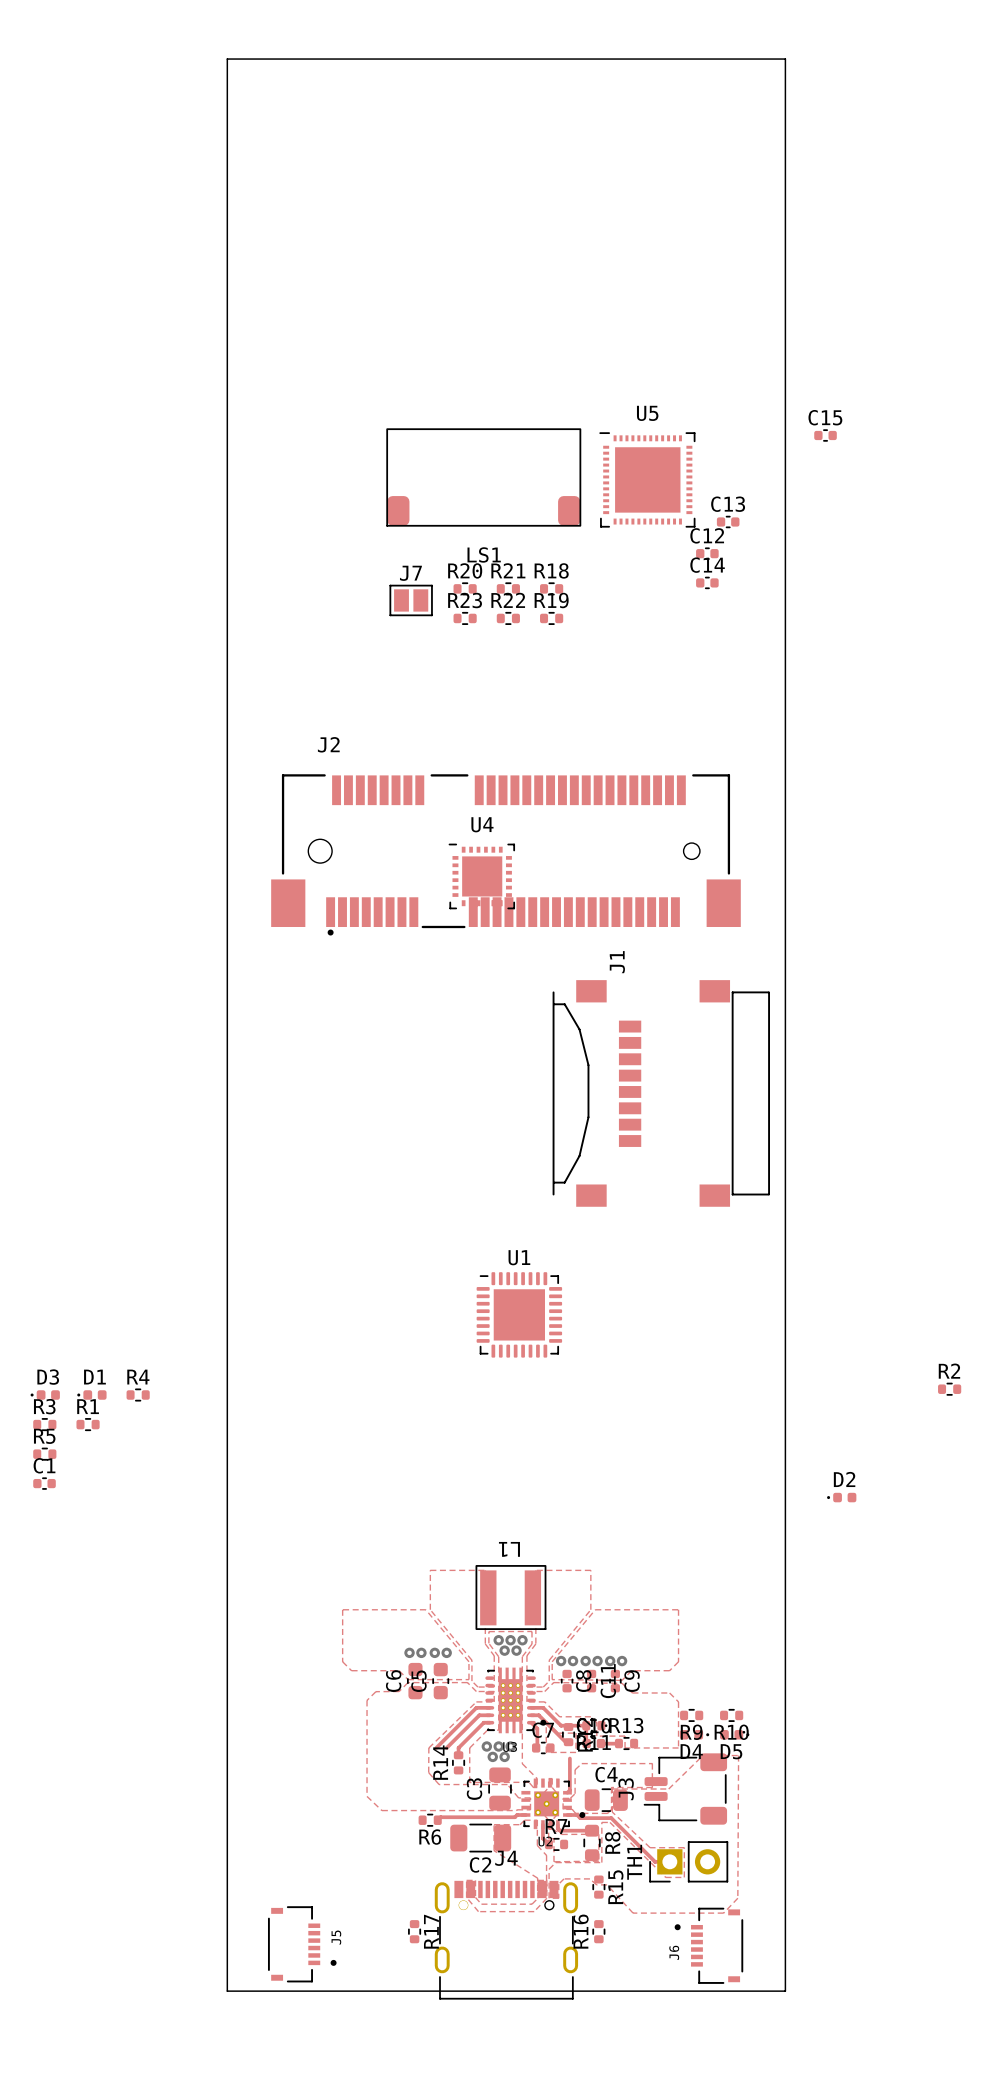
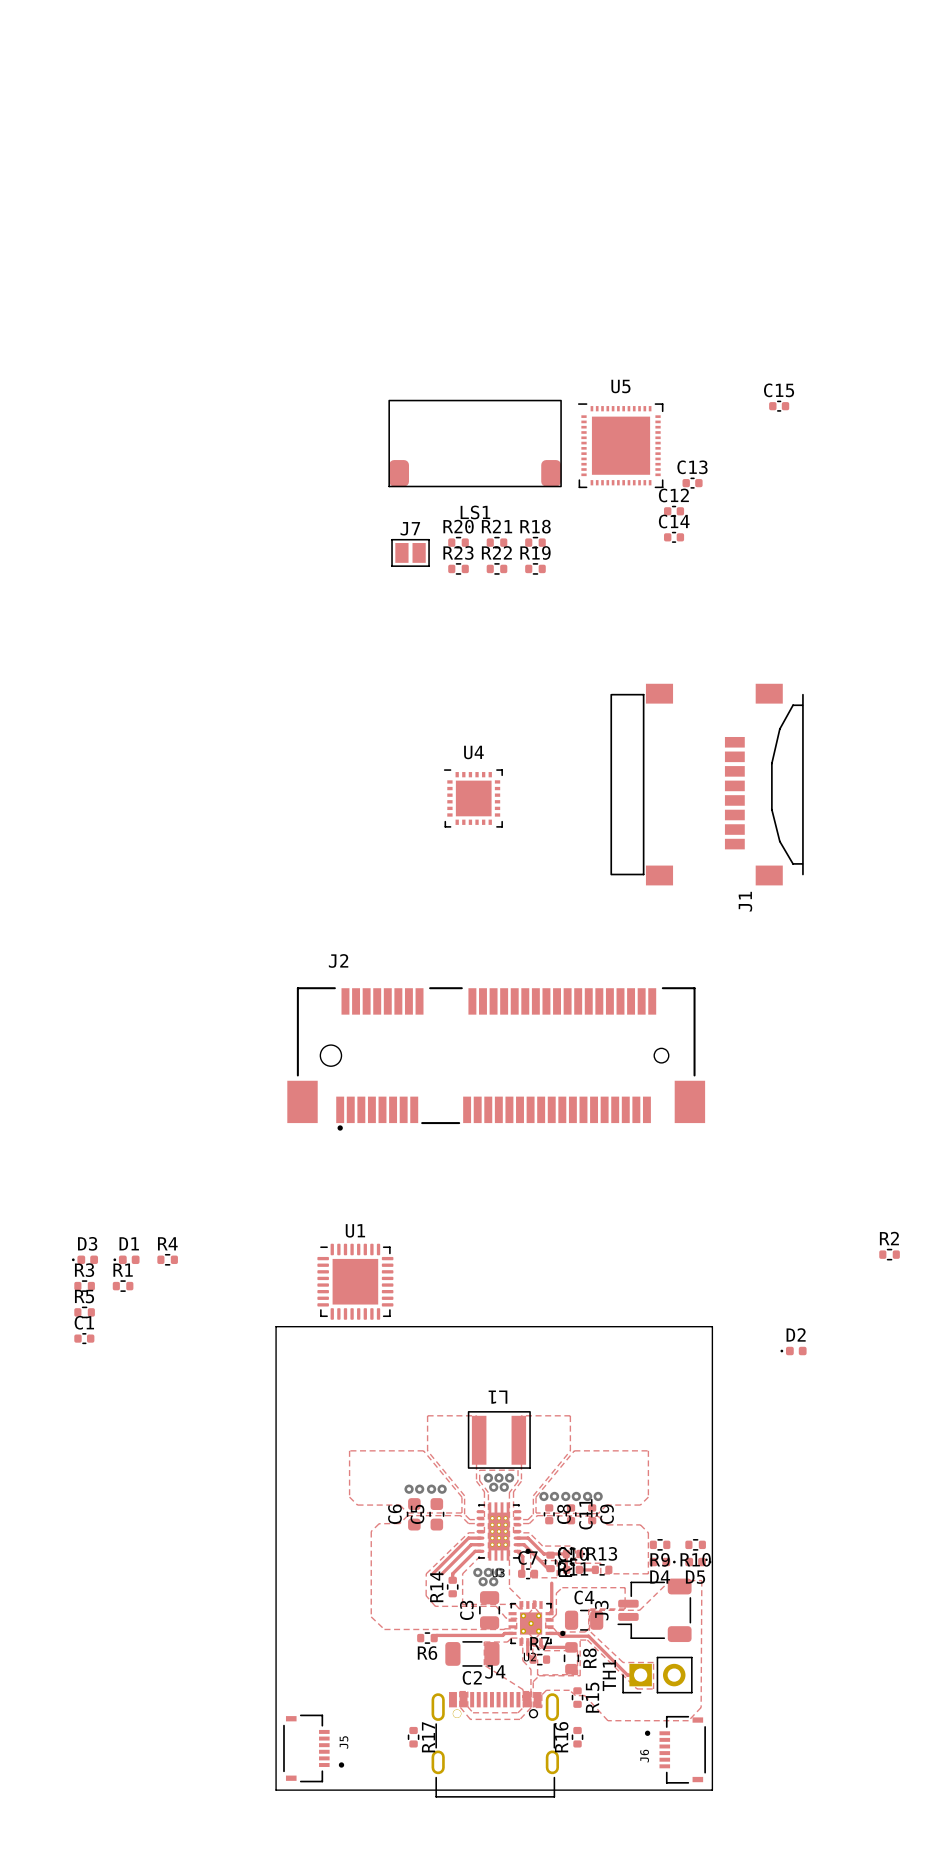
J2 position: (505, 854) -> (496, 1058)
J1 rotation: 0° (661, 1093) -> 180° (707, 784)
J1 position: (661, 1093) -> (707, 784)
U1 position: (519, 1314) -> (355, 1281)
board edge: (260, 1991) (227, 1991) (227, 59) (785, 59) (785, 1991) (750, 1991) -> (276, 1790) (276, 1326) (712, 1326) (712, 1790)

